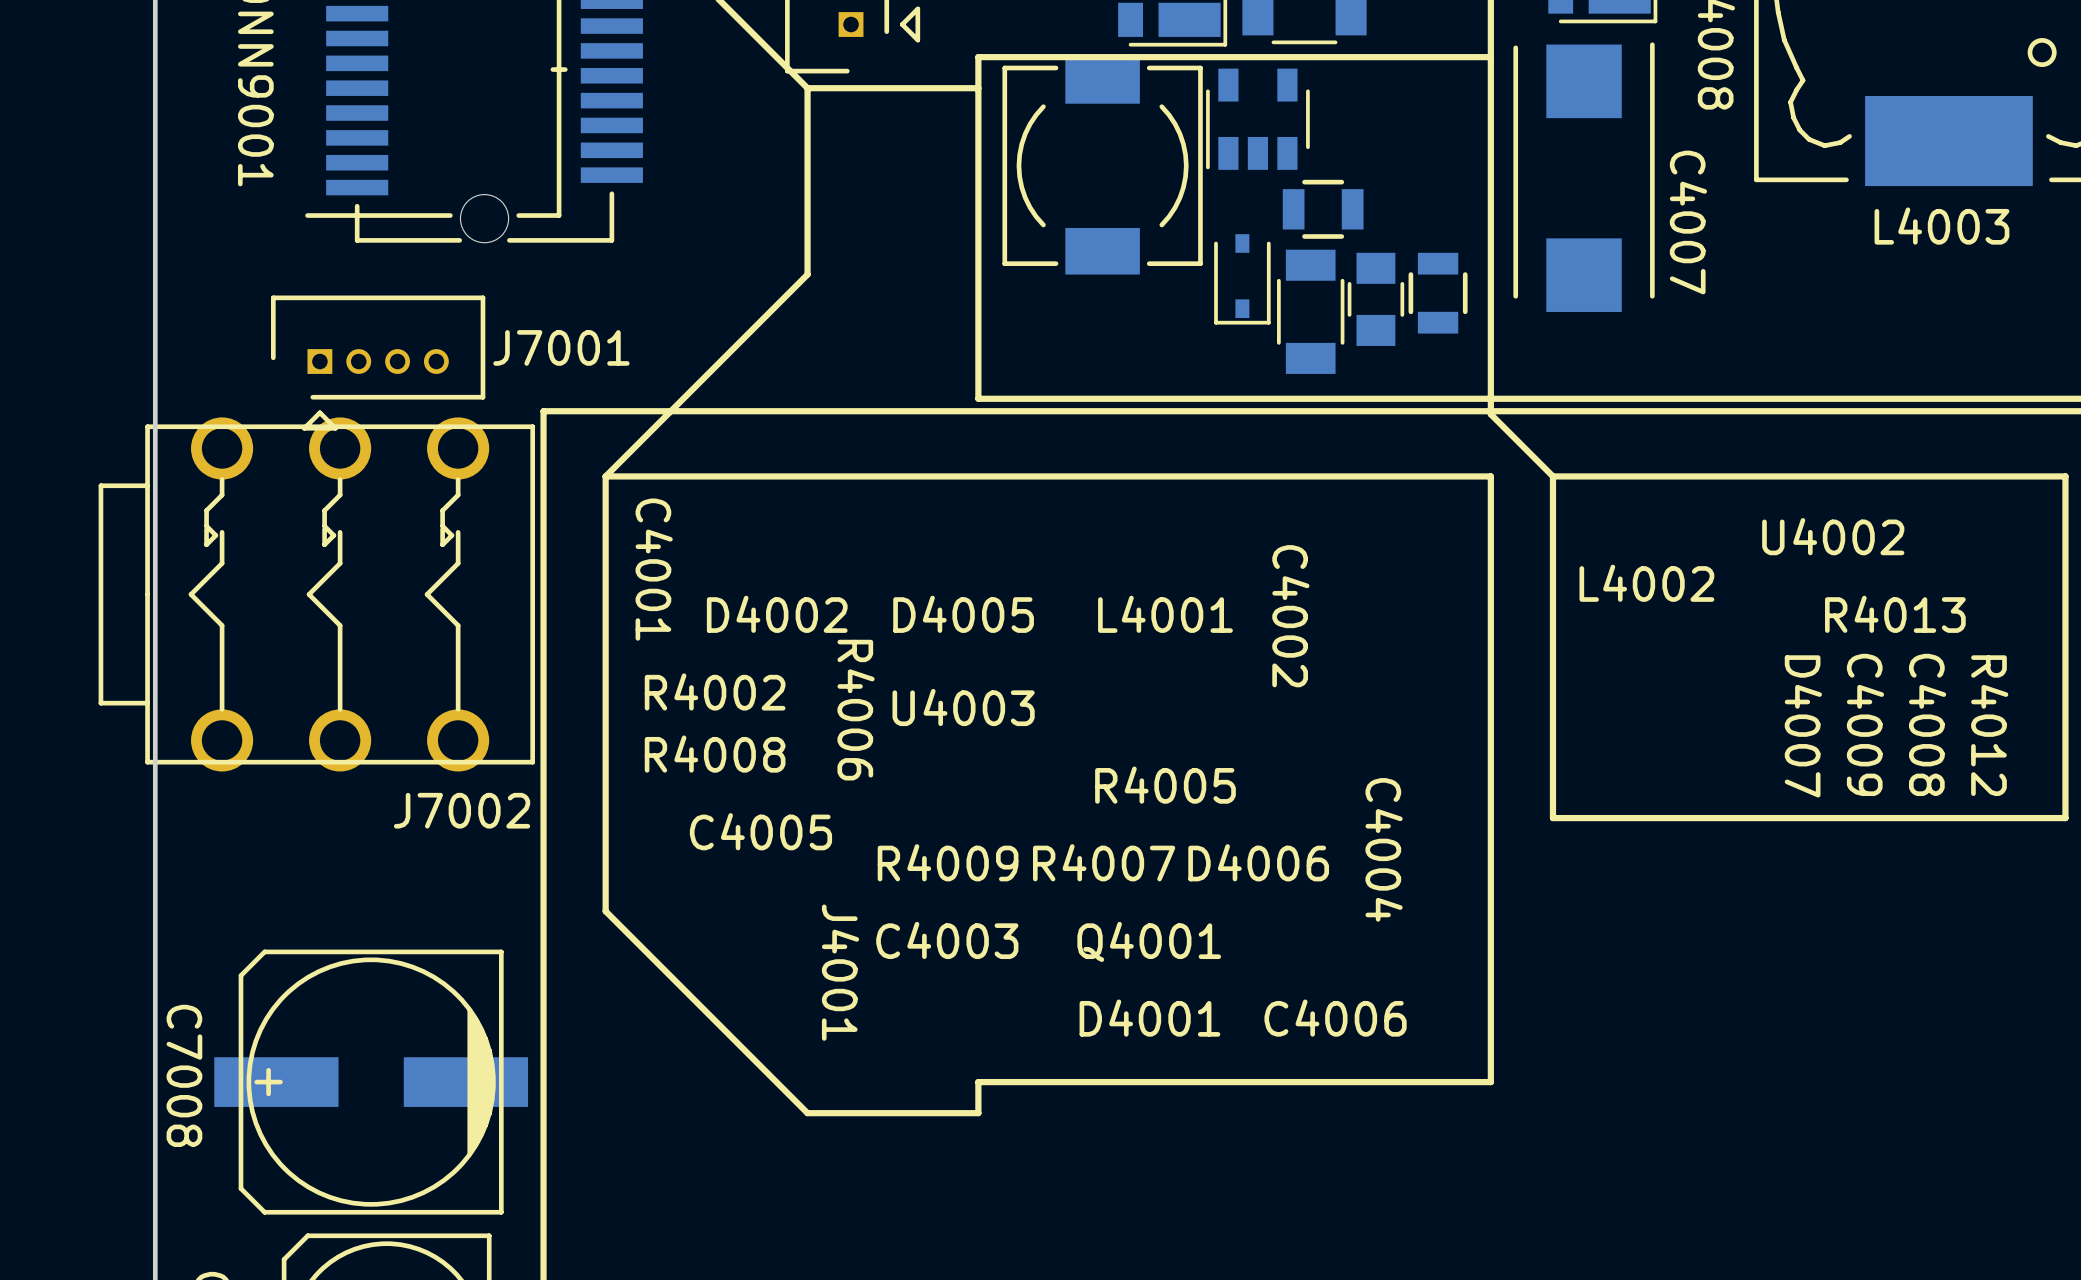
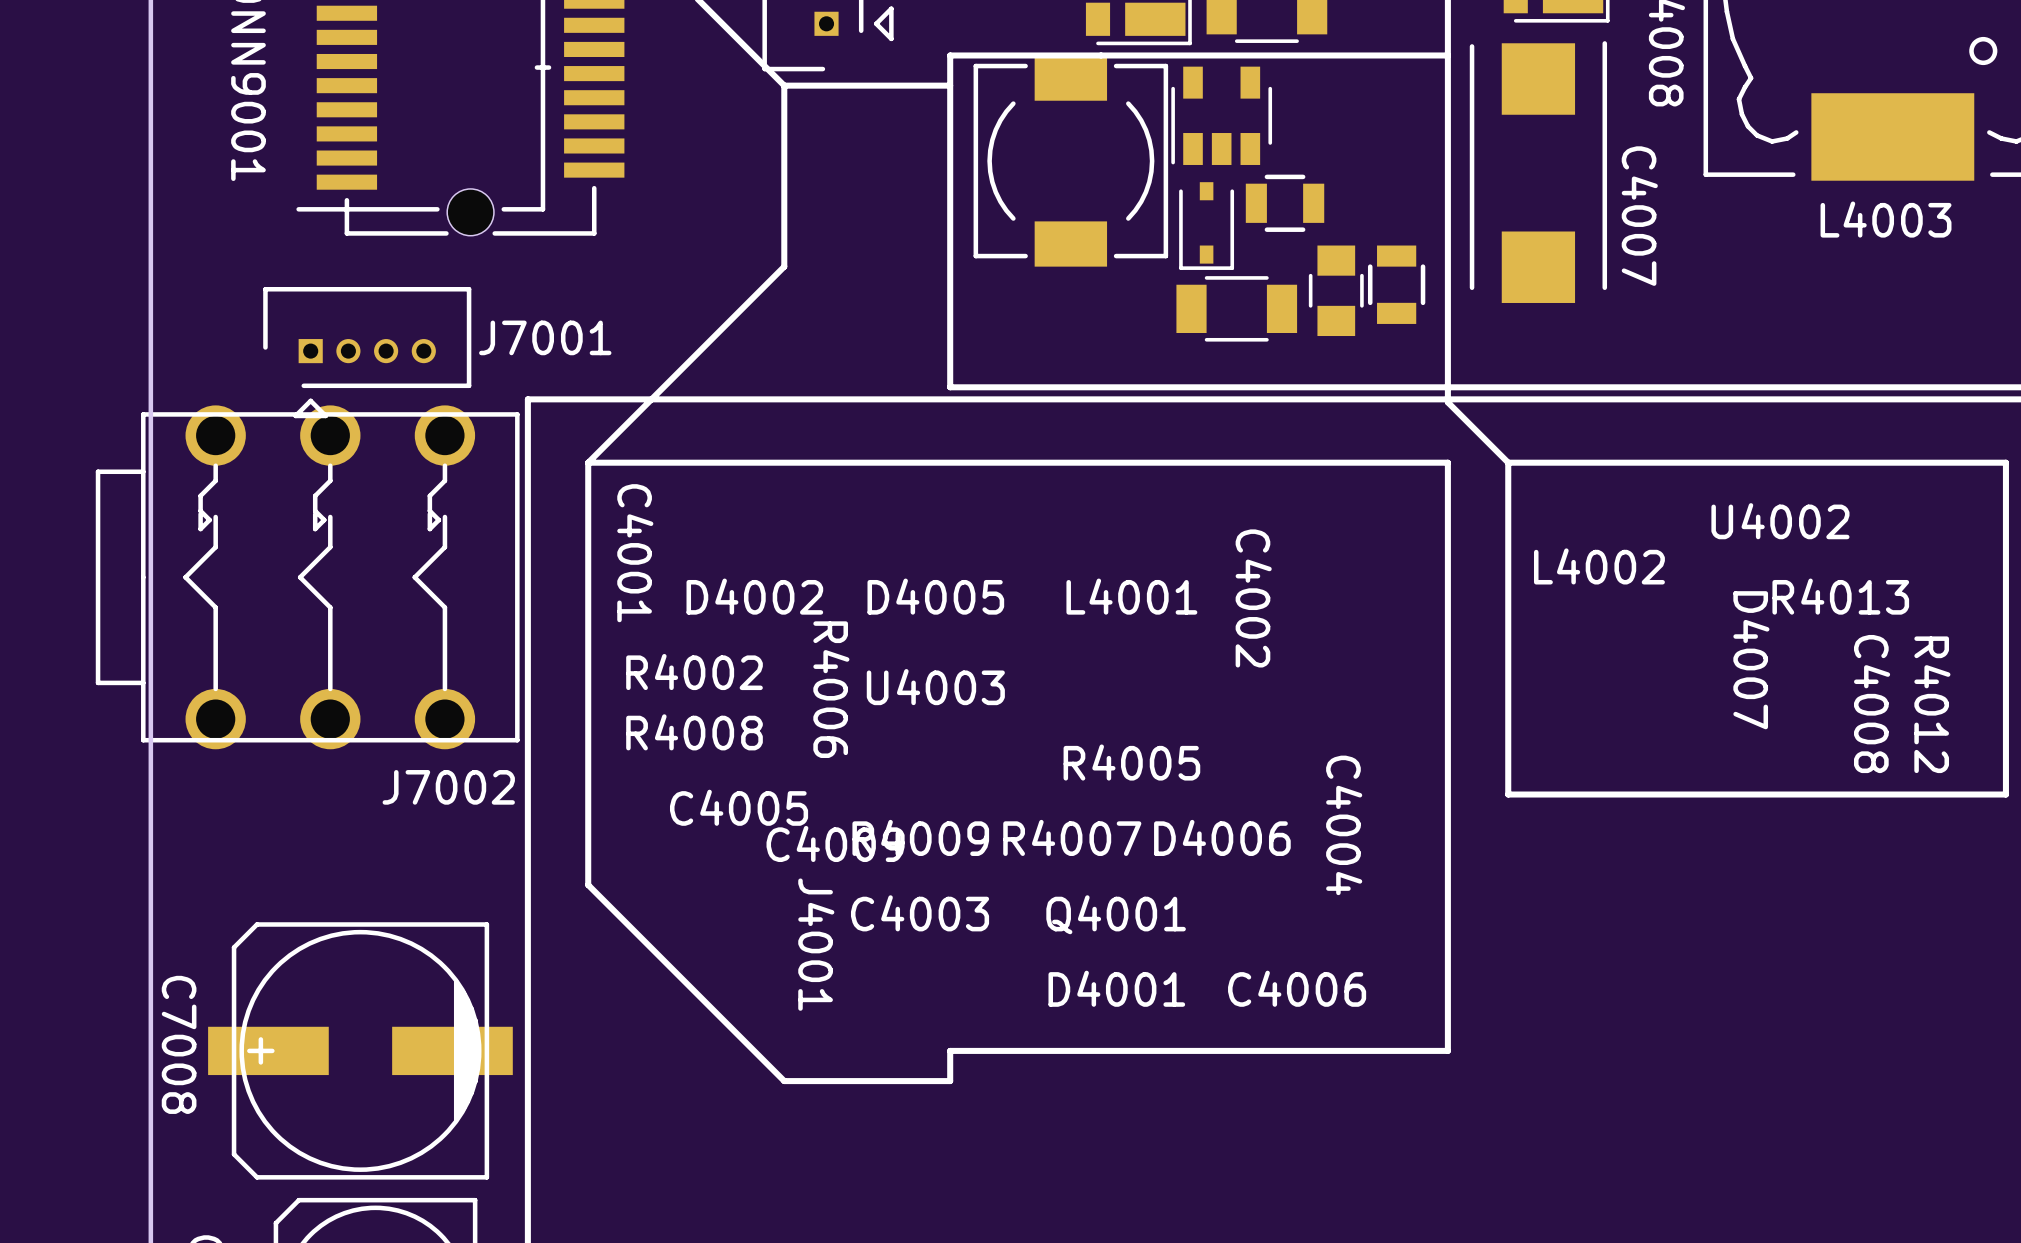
D4007 position: (1242, 279) -> (1206, 226)
C4009 rotation: 0° (1310, 311) -> 90° clockwise (1236, 308)

